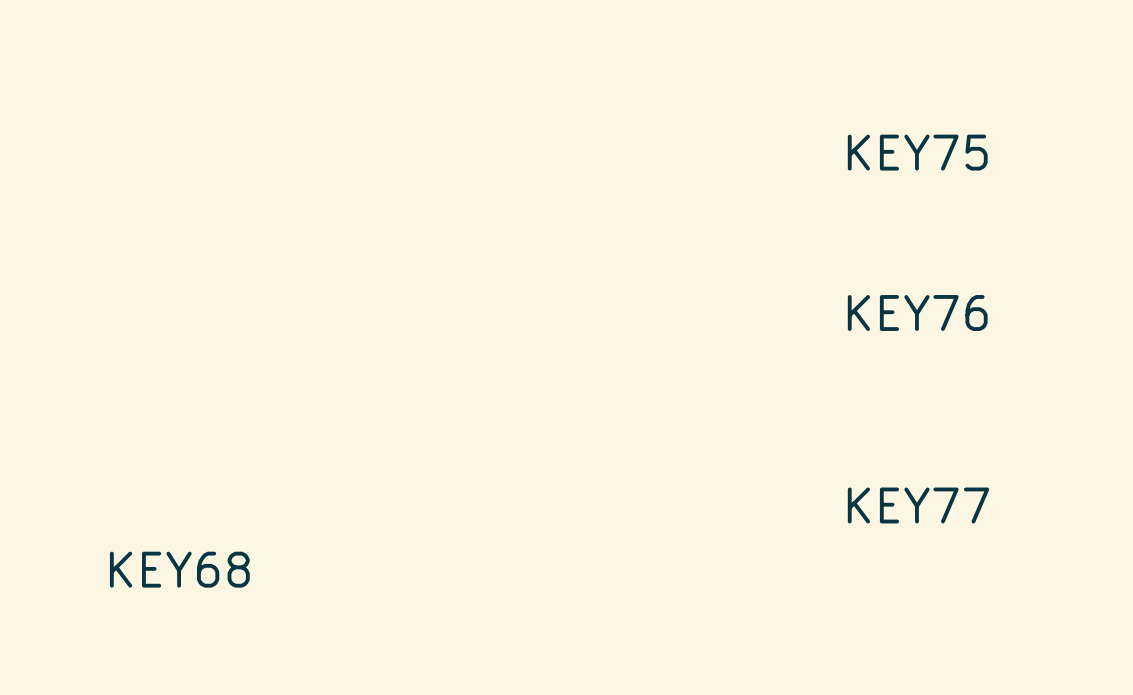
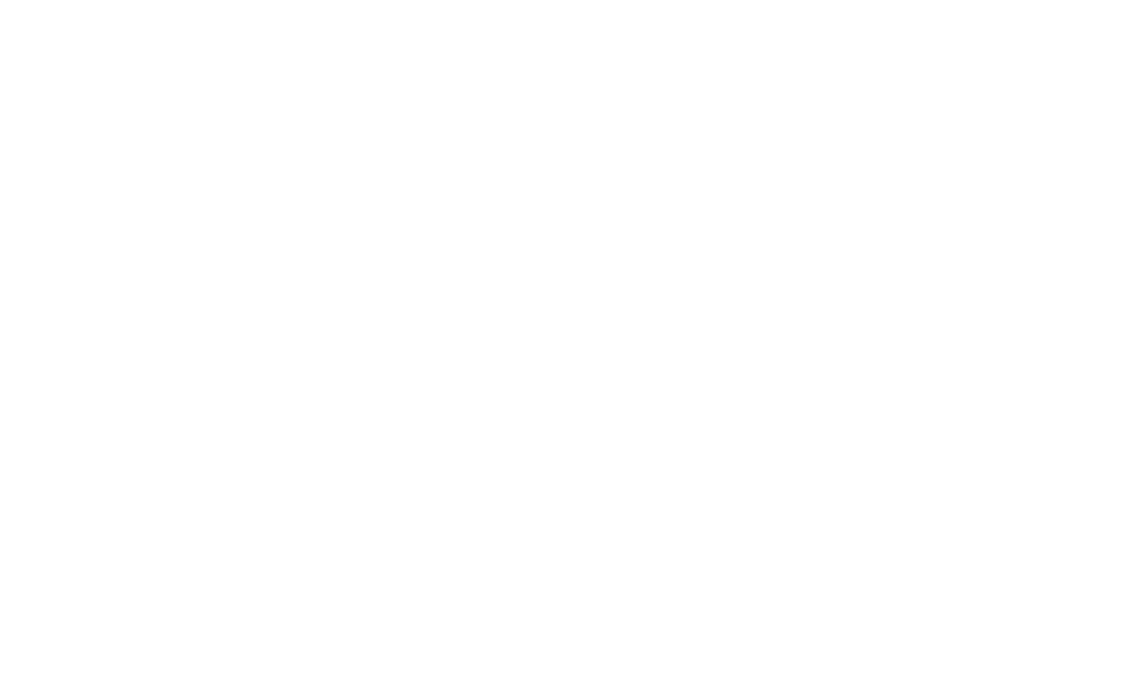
label: KEY75 (917, 152) -> none
label: KEY76 (917, 313) -> none
label: KEY77 (918, 505) -> none
label: KEY68 (179, 569) -> none

